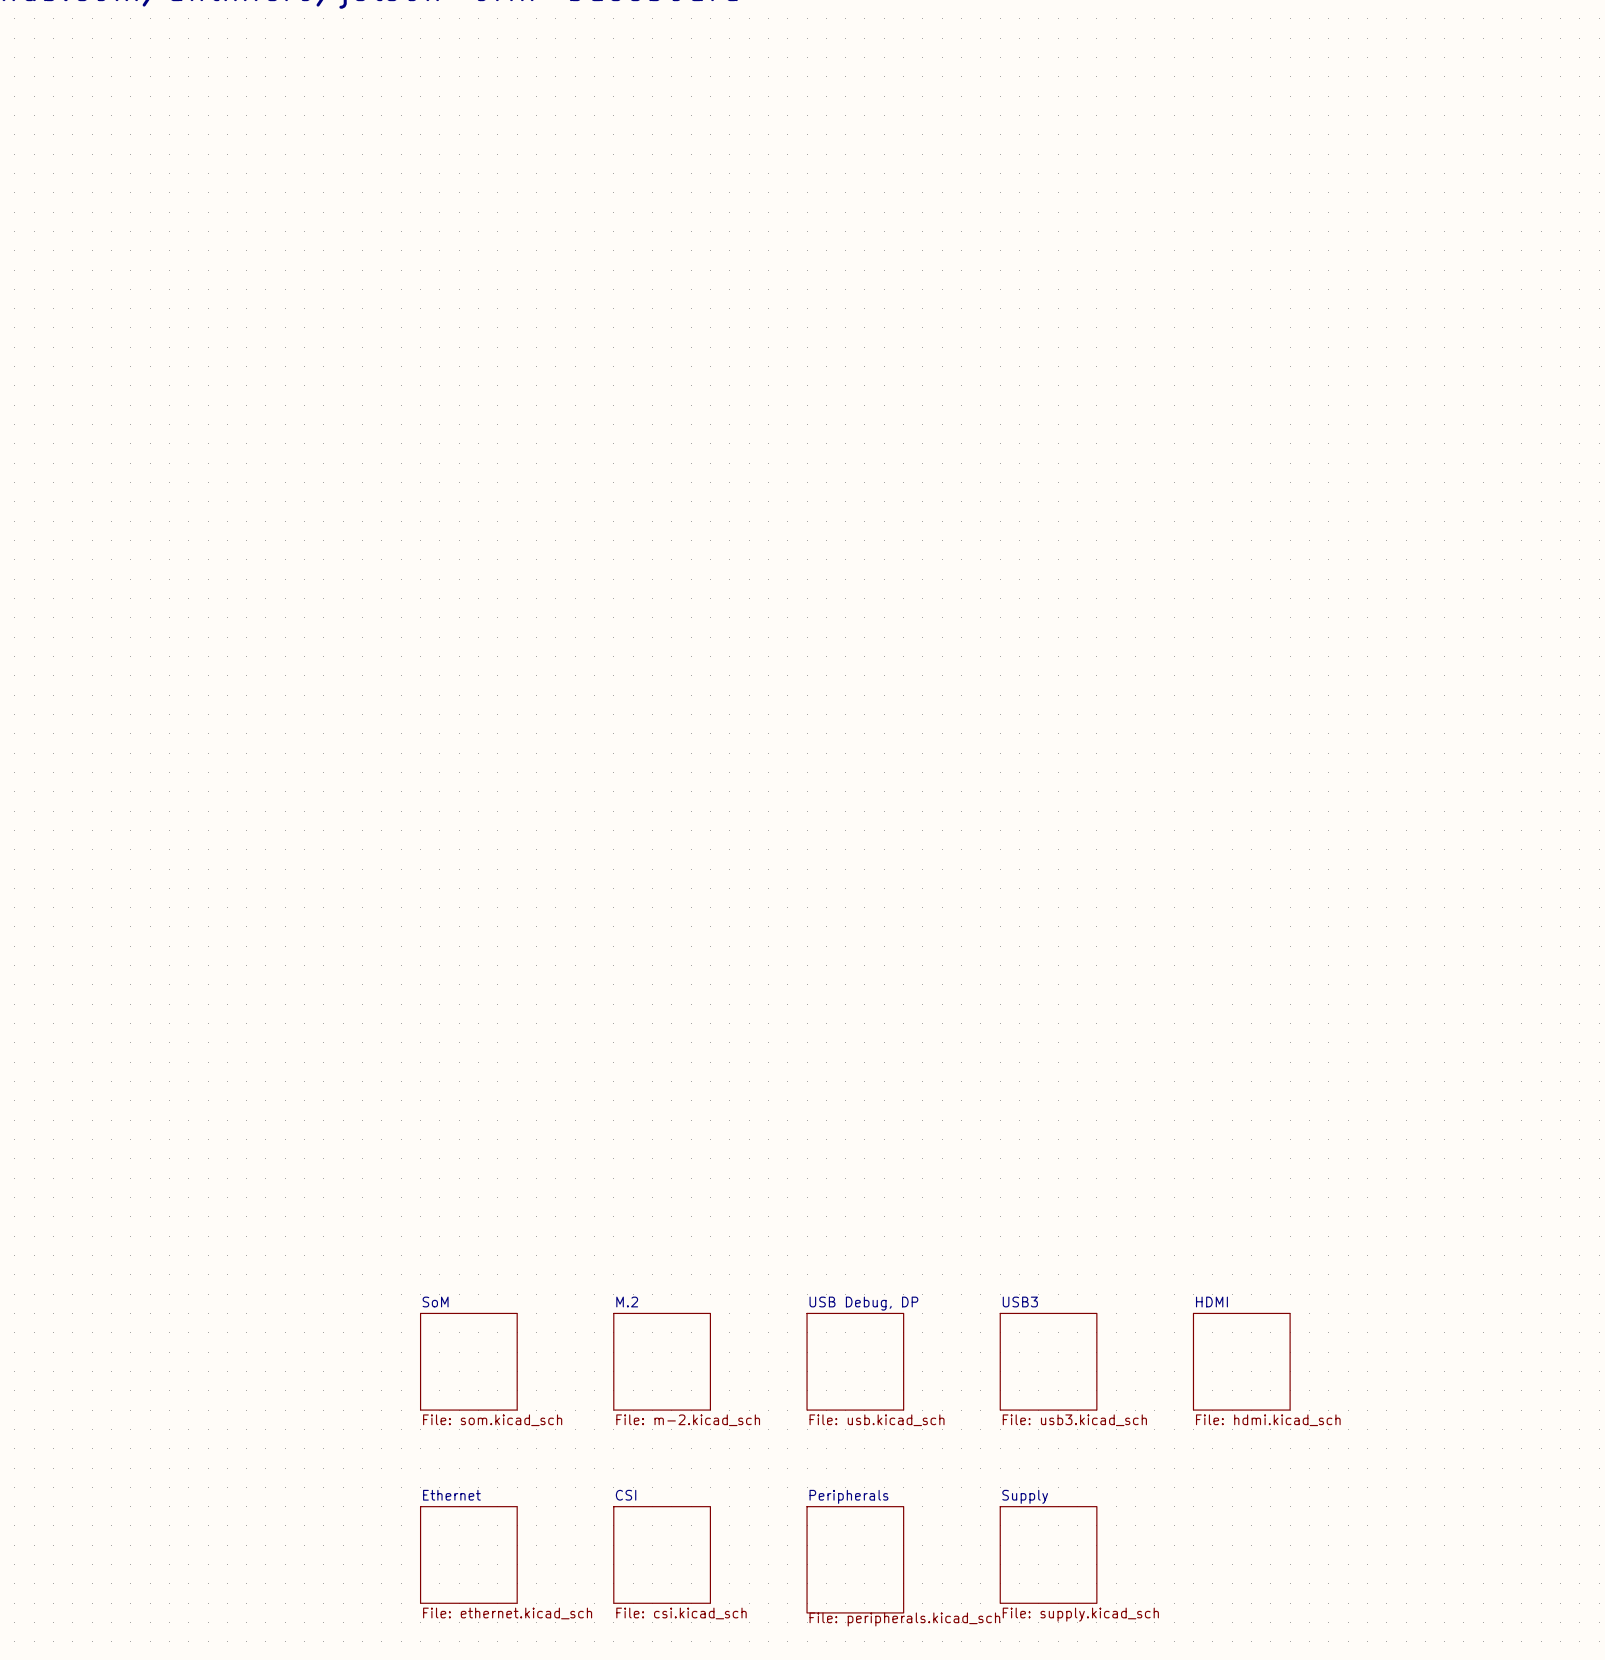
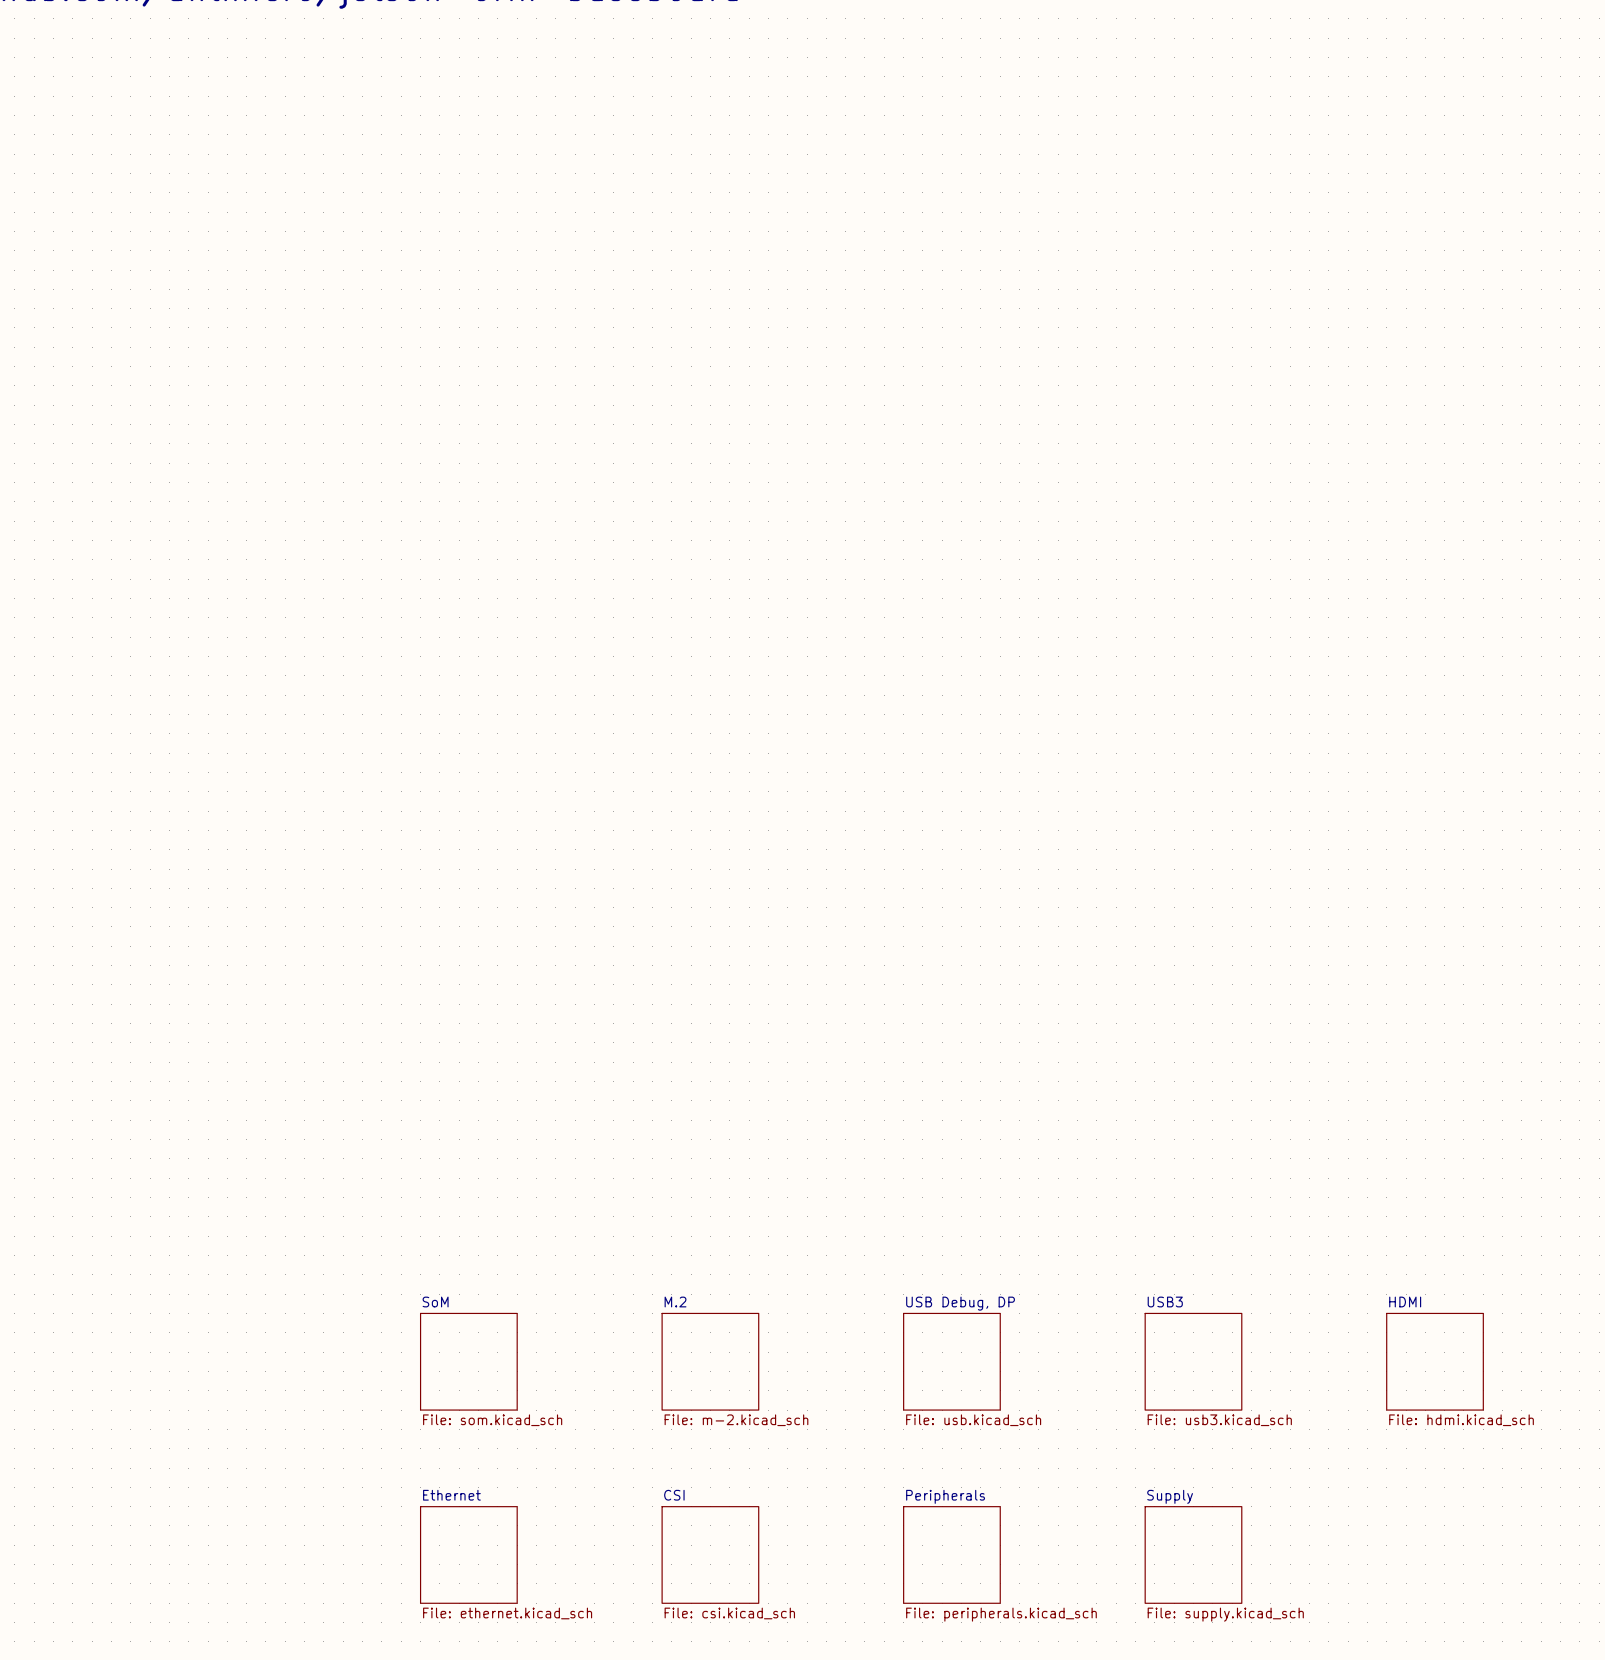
sheet M.2 position: (662, 1361) -> (710, 1361)
sheet USB Debug, DP position: (855, 1361) -> (951, 1361)
sheet USB3 position: (1048, 1361) -> (1193, 1361)
sheet HDMI: File: hdmi.kicad_sch (1241, 1361) -> none
sheet HDMI: none -> File: hdmi.kicad_sch (1435, 1361)
sheet CSI position: (662, 1554) -> (710, 1554)
sheet Peripherals: none -> File: peripherals.kicad_sch (951, 1554)
sheet Supply position: (1048, 1554) -> (1193, 1554)
sheet Peripherals: File: peripherals.kicad_sch (855, 1559) -> none

